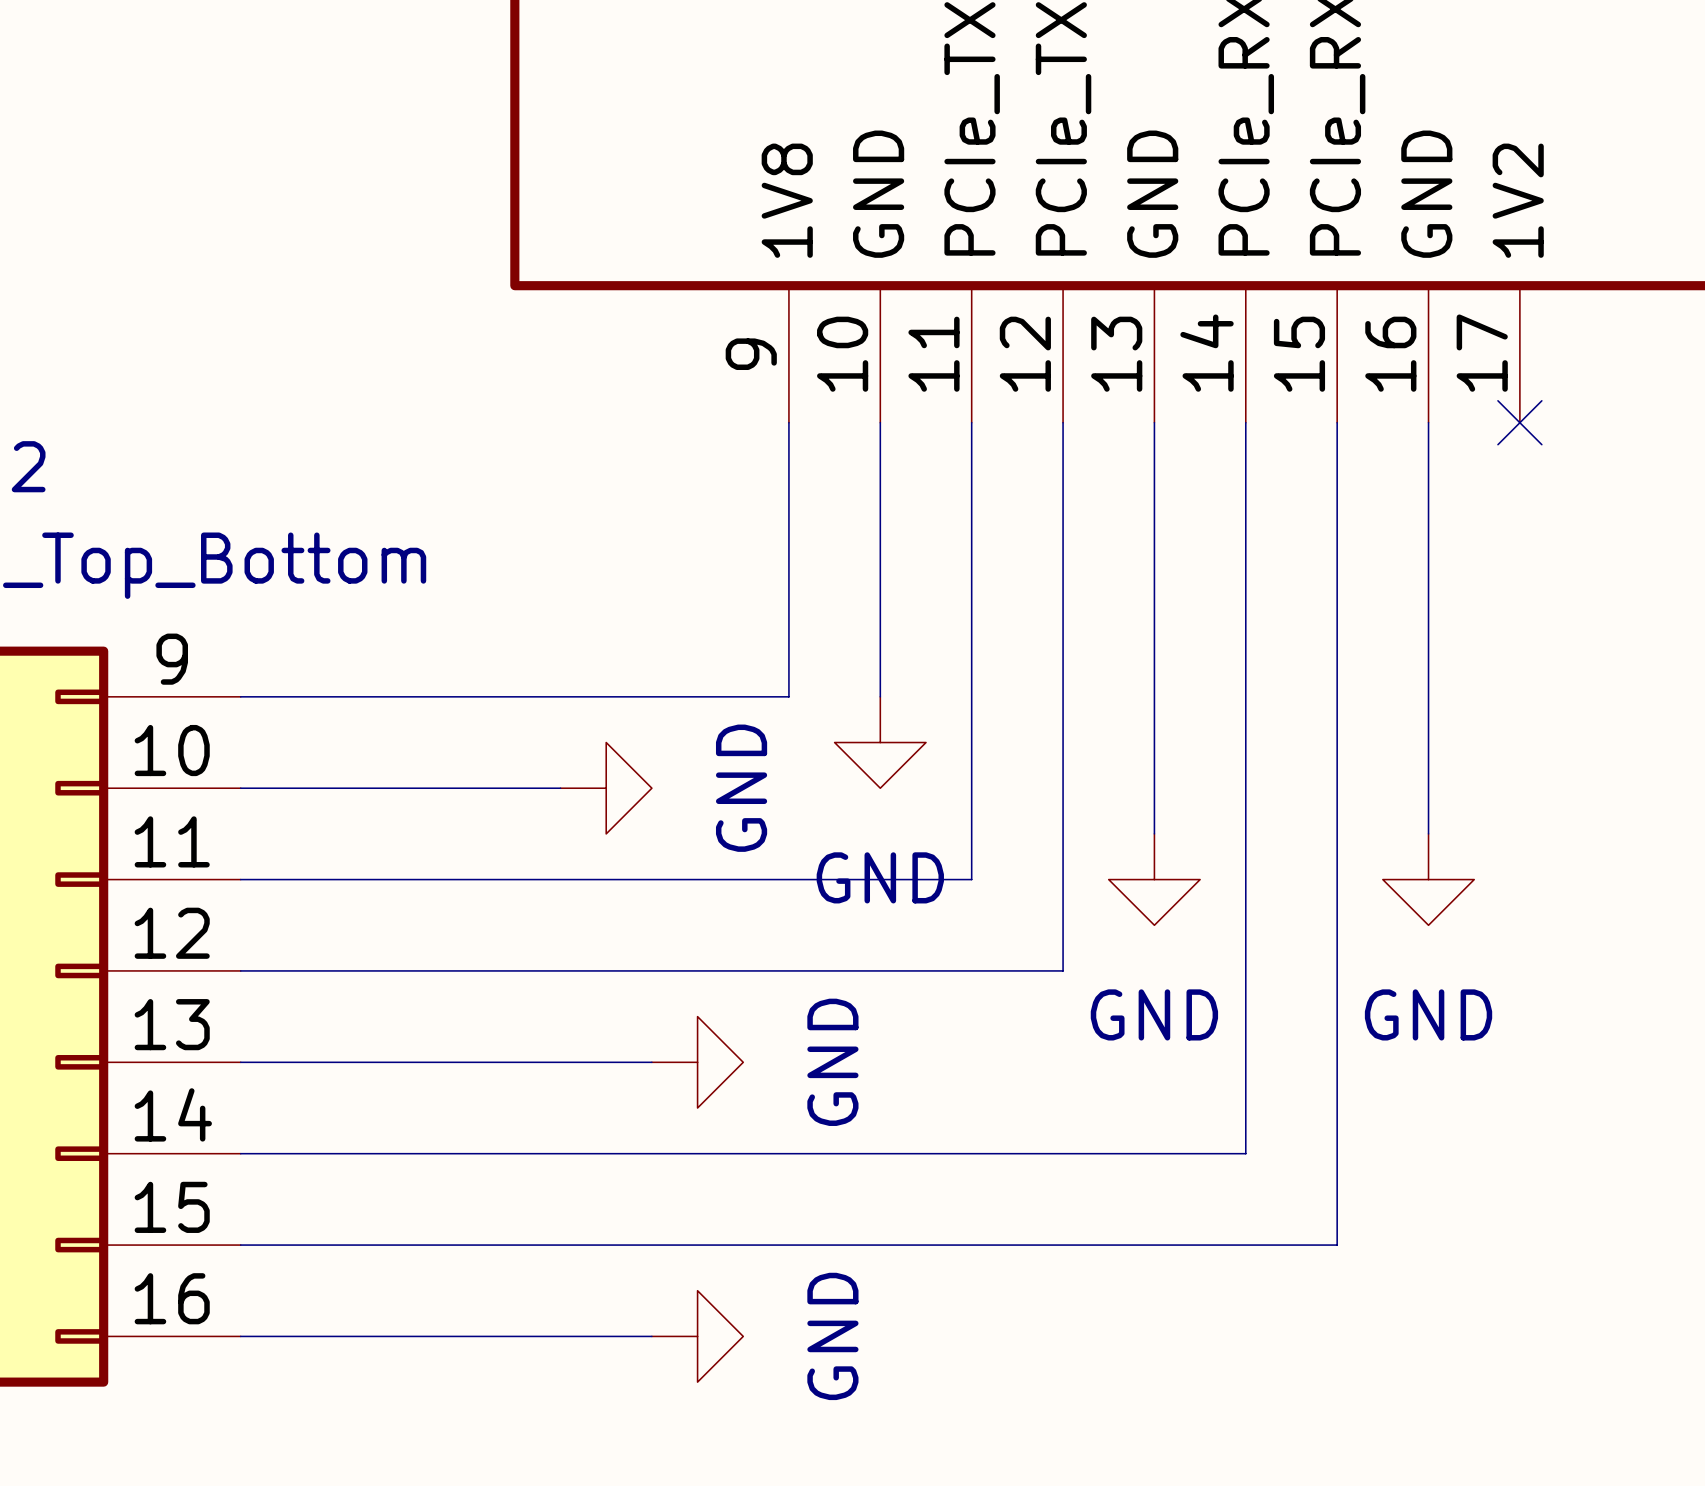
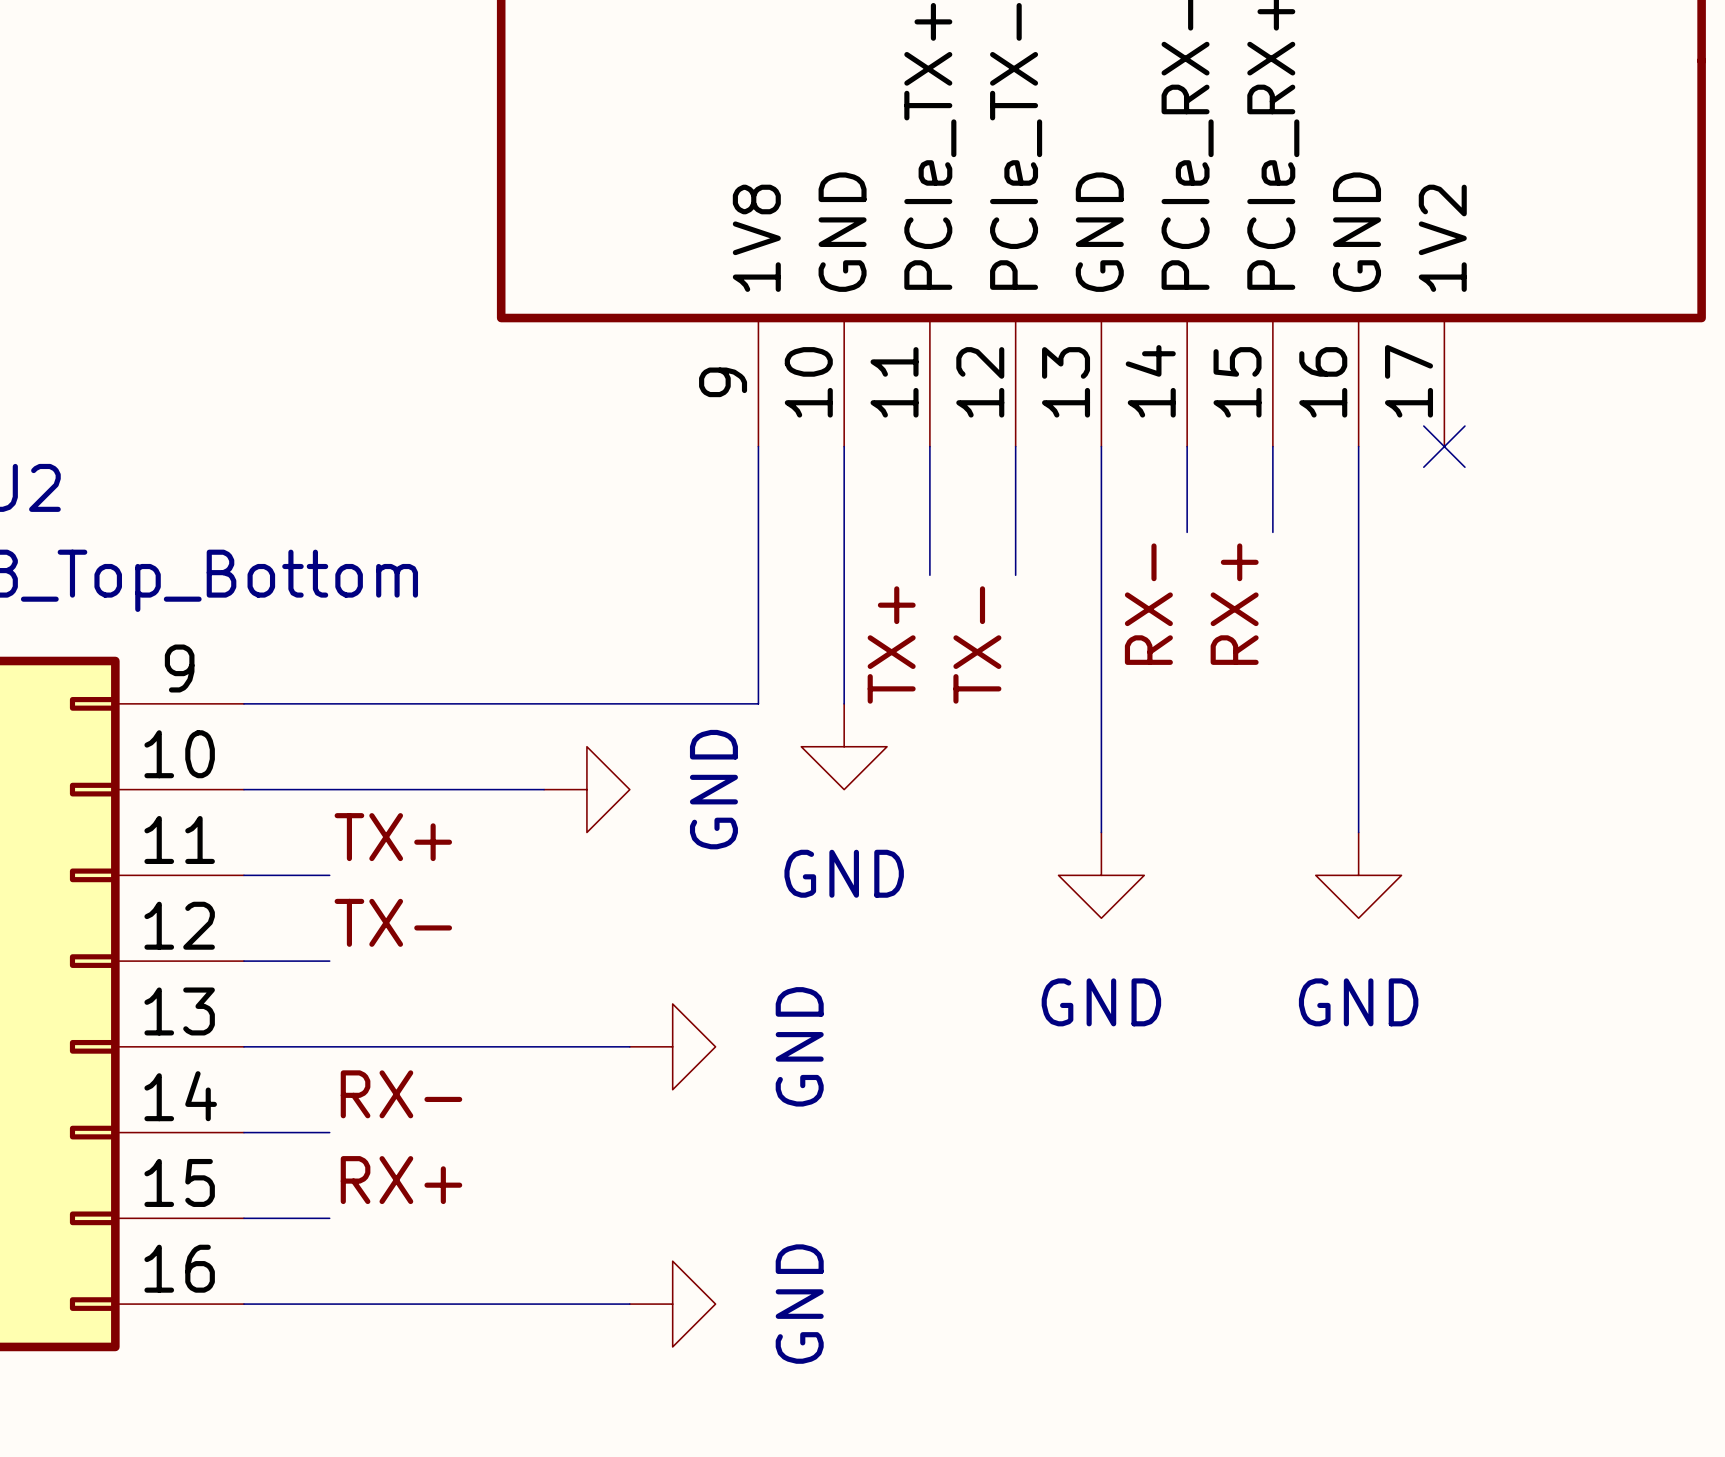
wire: (1245, 514) (1245, 1153) (332, 1153) -> none
wire: (1337, 514) (1337, 1245) (332, 1245) -> none
wire: (971, 559) (971, 879) (332, 879) -> none
wire: (1063, 559) (1063, 970) (332, 970) -> none
label: none -> RX- (1148, 604)
label: none -> RX+ (1234, 604)
label: none -> TX+ (891, 644)
label: none -> TX- (977, 644)
label: none -> TX+ (393, 837)
label: none -> TX- (393, 922)
label: none -> RX- (401, 1094)
label: none -> RX+ (401, 1180)

